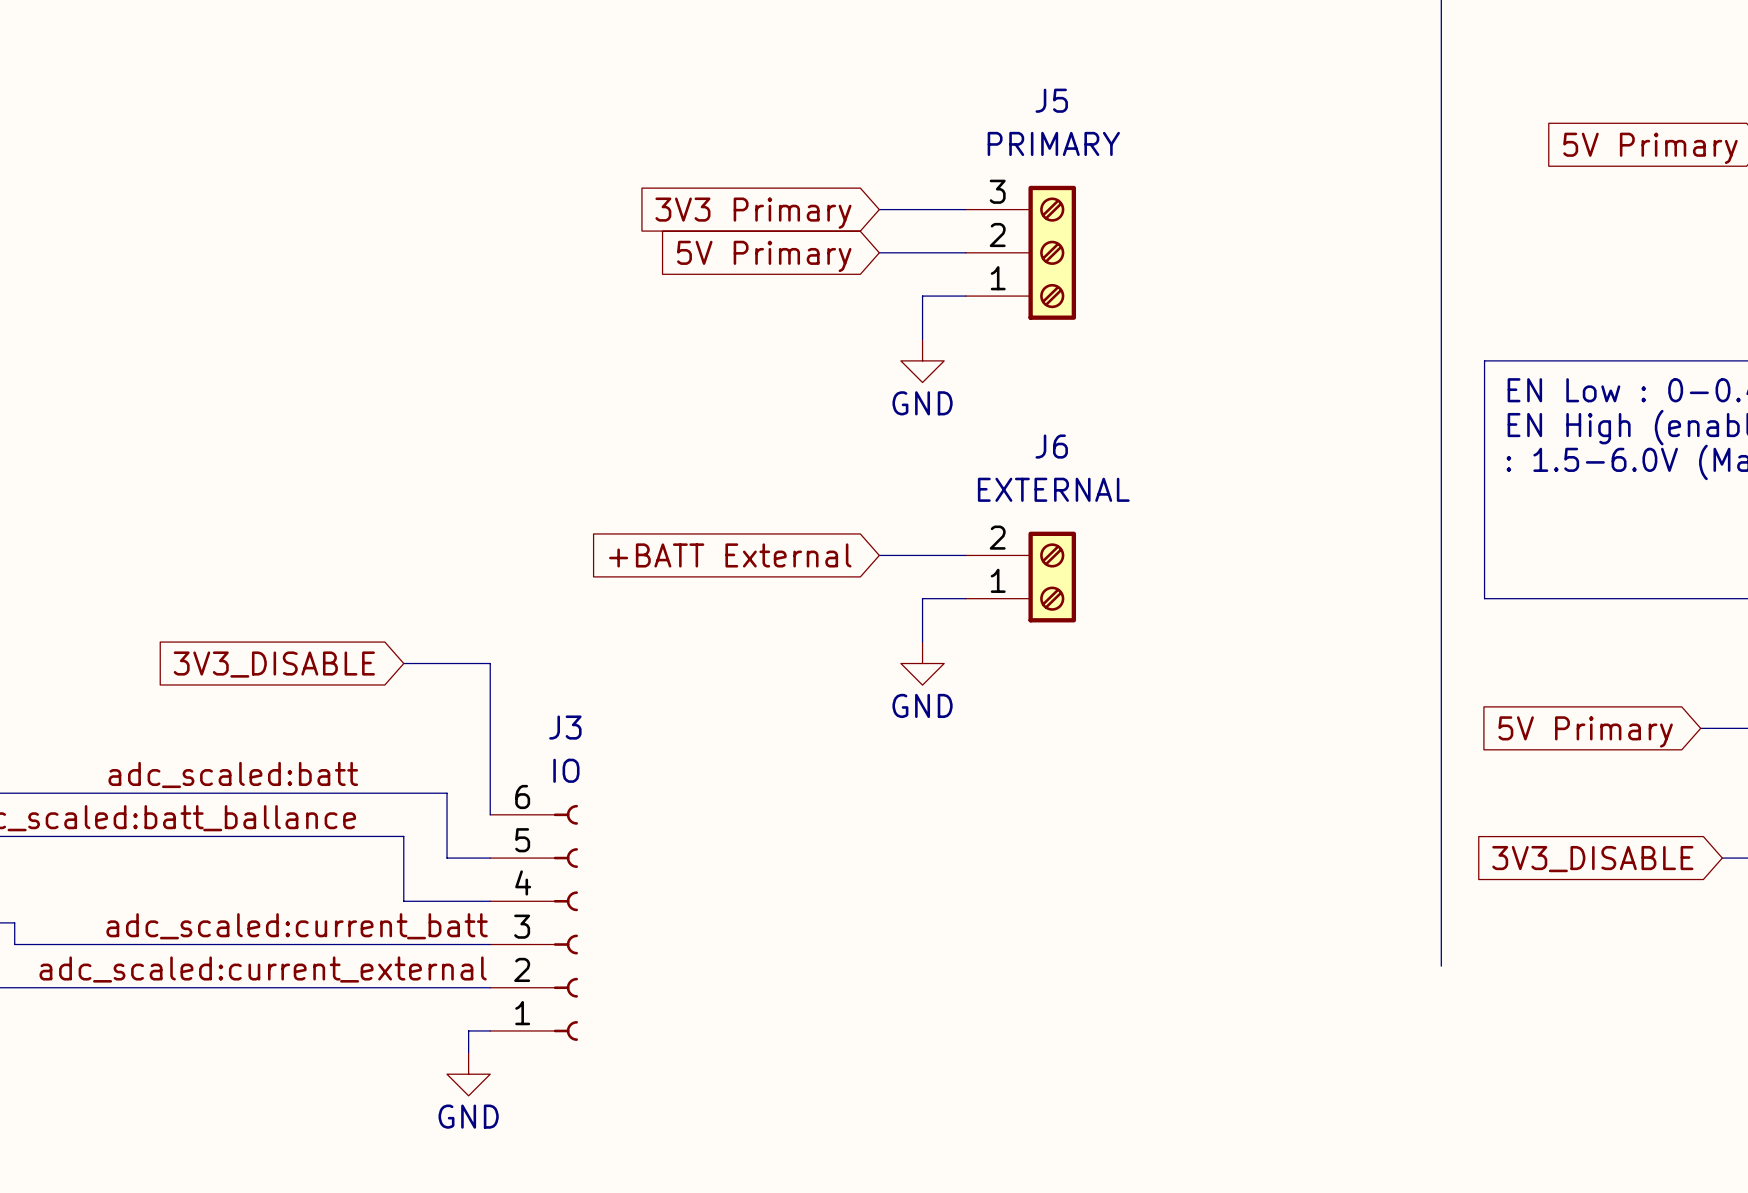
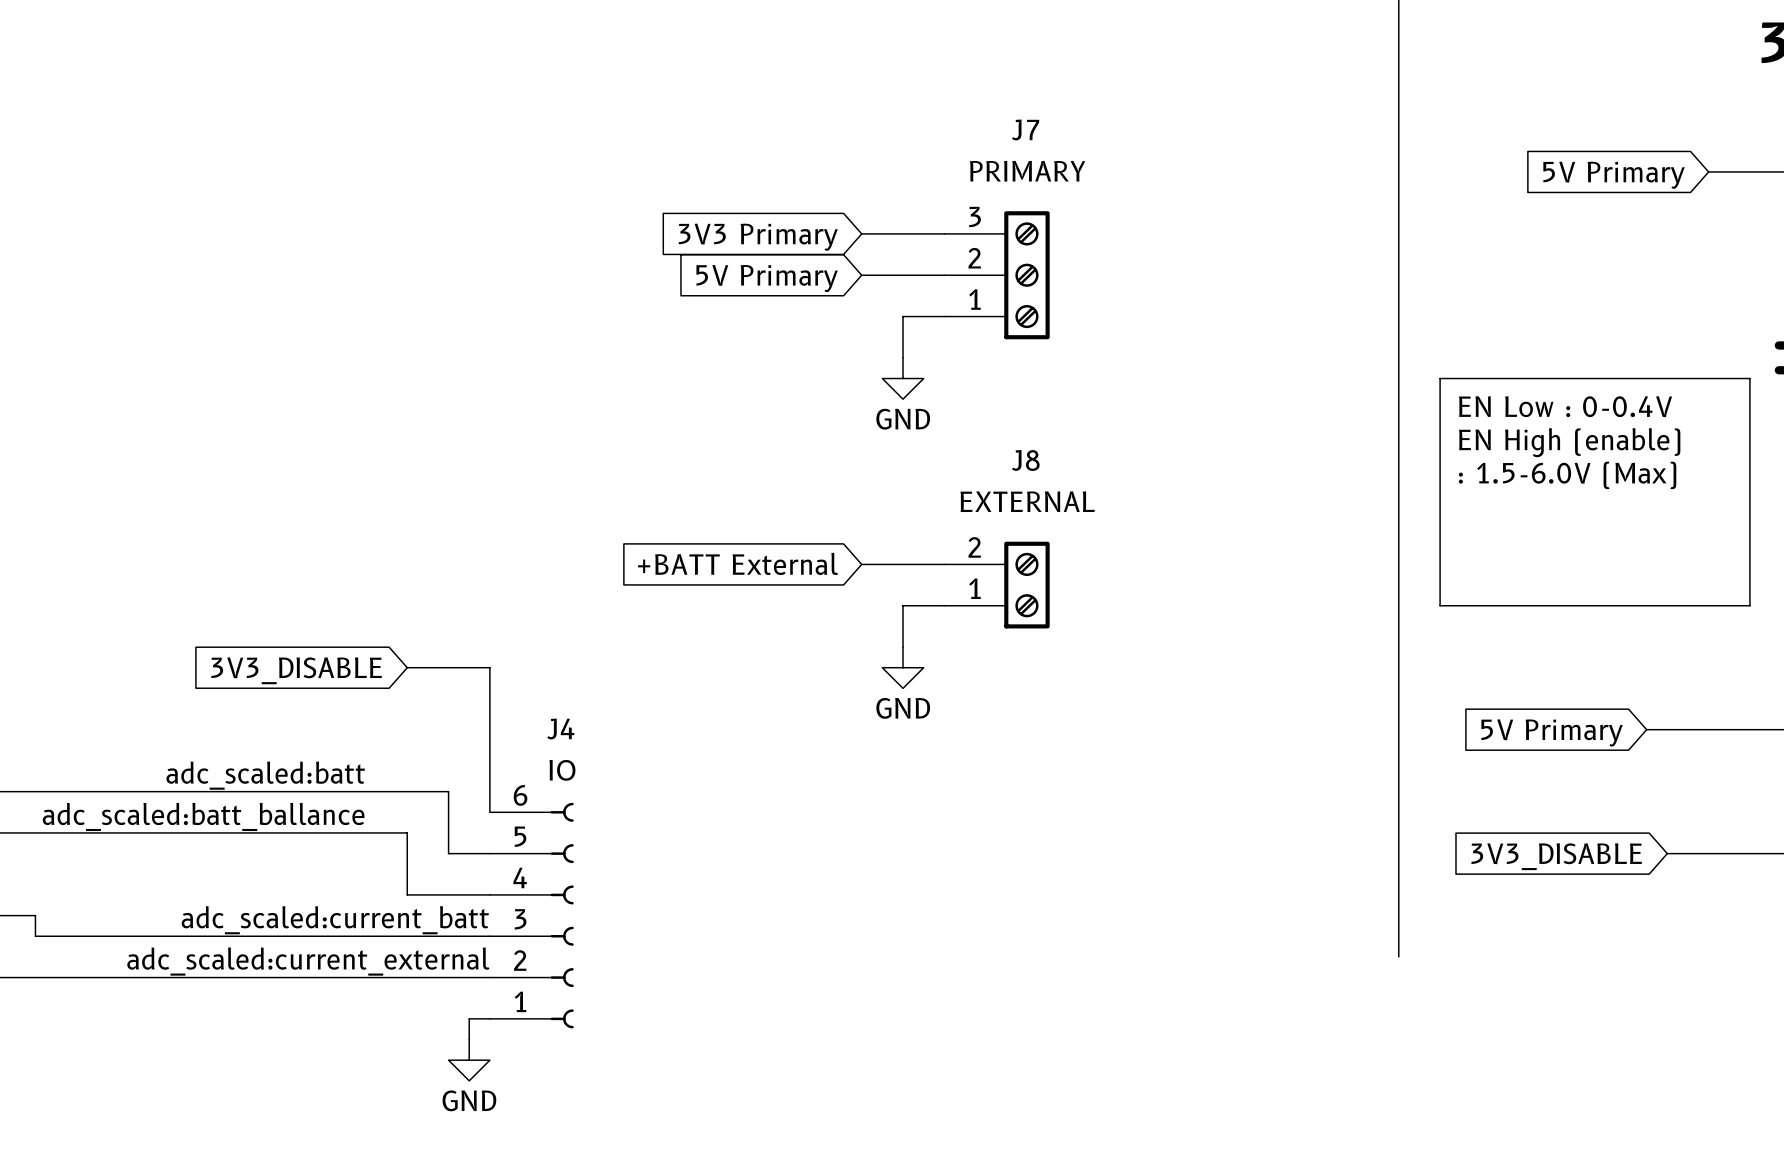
J5 name: J5 (1051, 100) -> J7 (1025, 129)
J6 name: J6 (1051, 446) -> J8 (1025, 460)
J3 name: J3 (565, 727) -> J4 (560, 729)

